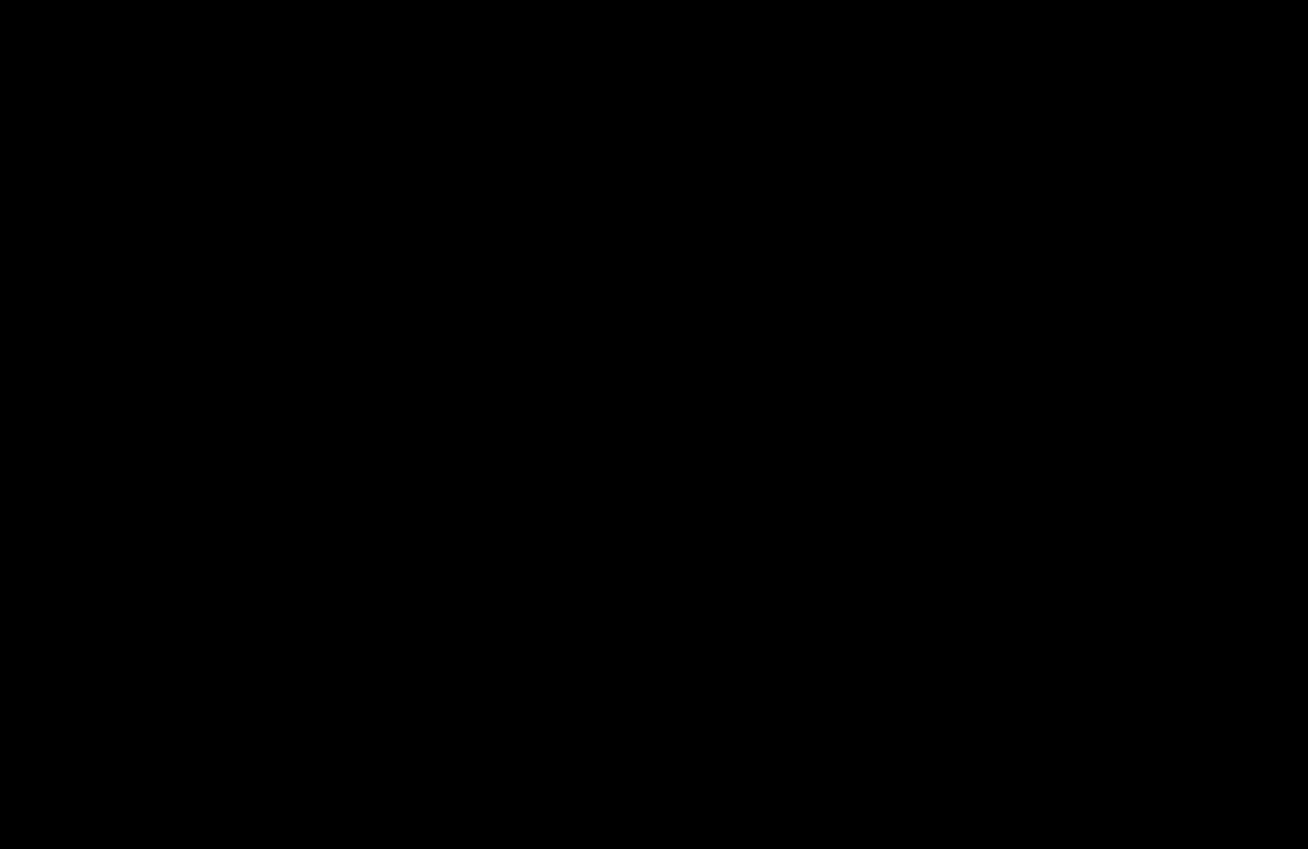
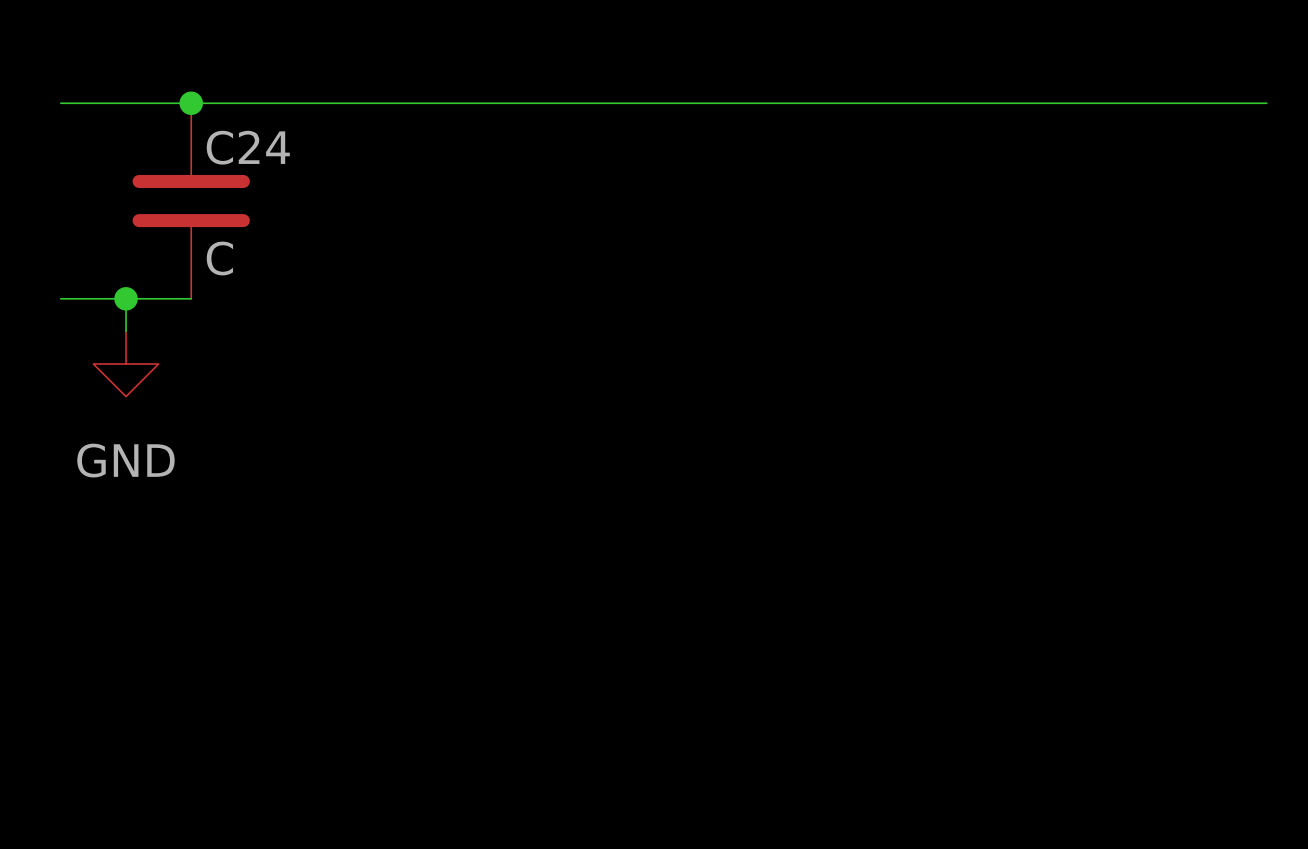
wire: none -> (60, 103) (1266, 103)
junction: none -> (191, 103)
C24: none -> C (191, 201)
wire: none -> (60, 298) (191, 298)
wire: none -> (126, 298) (126, 331)
junction: none -> (126, 298)
power symbol: none -> GND (126, 363)

